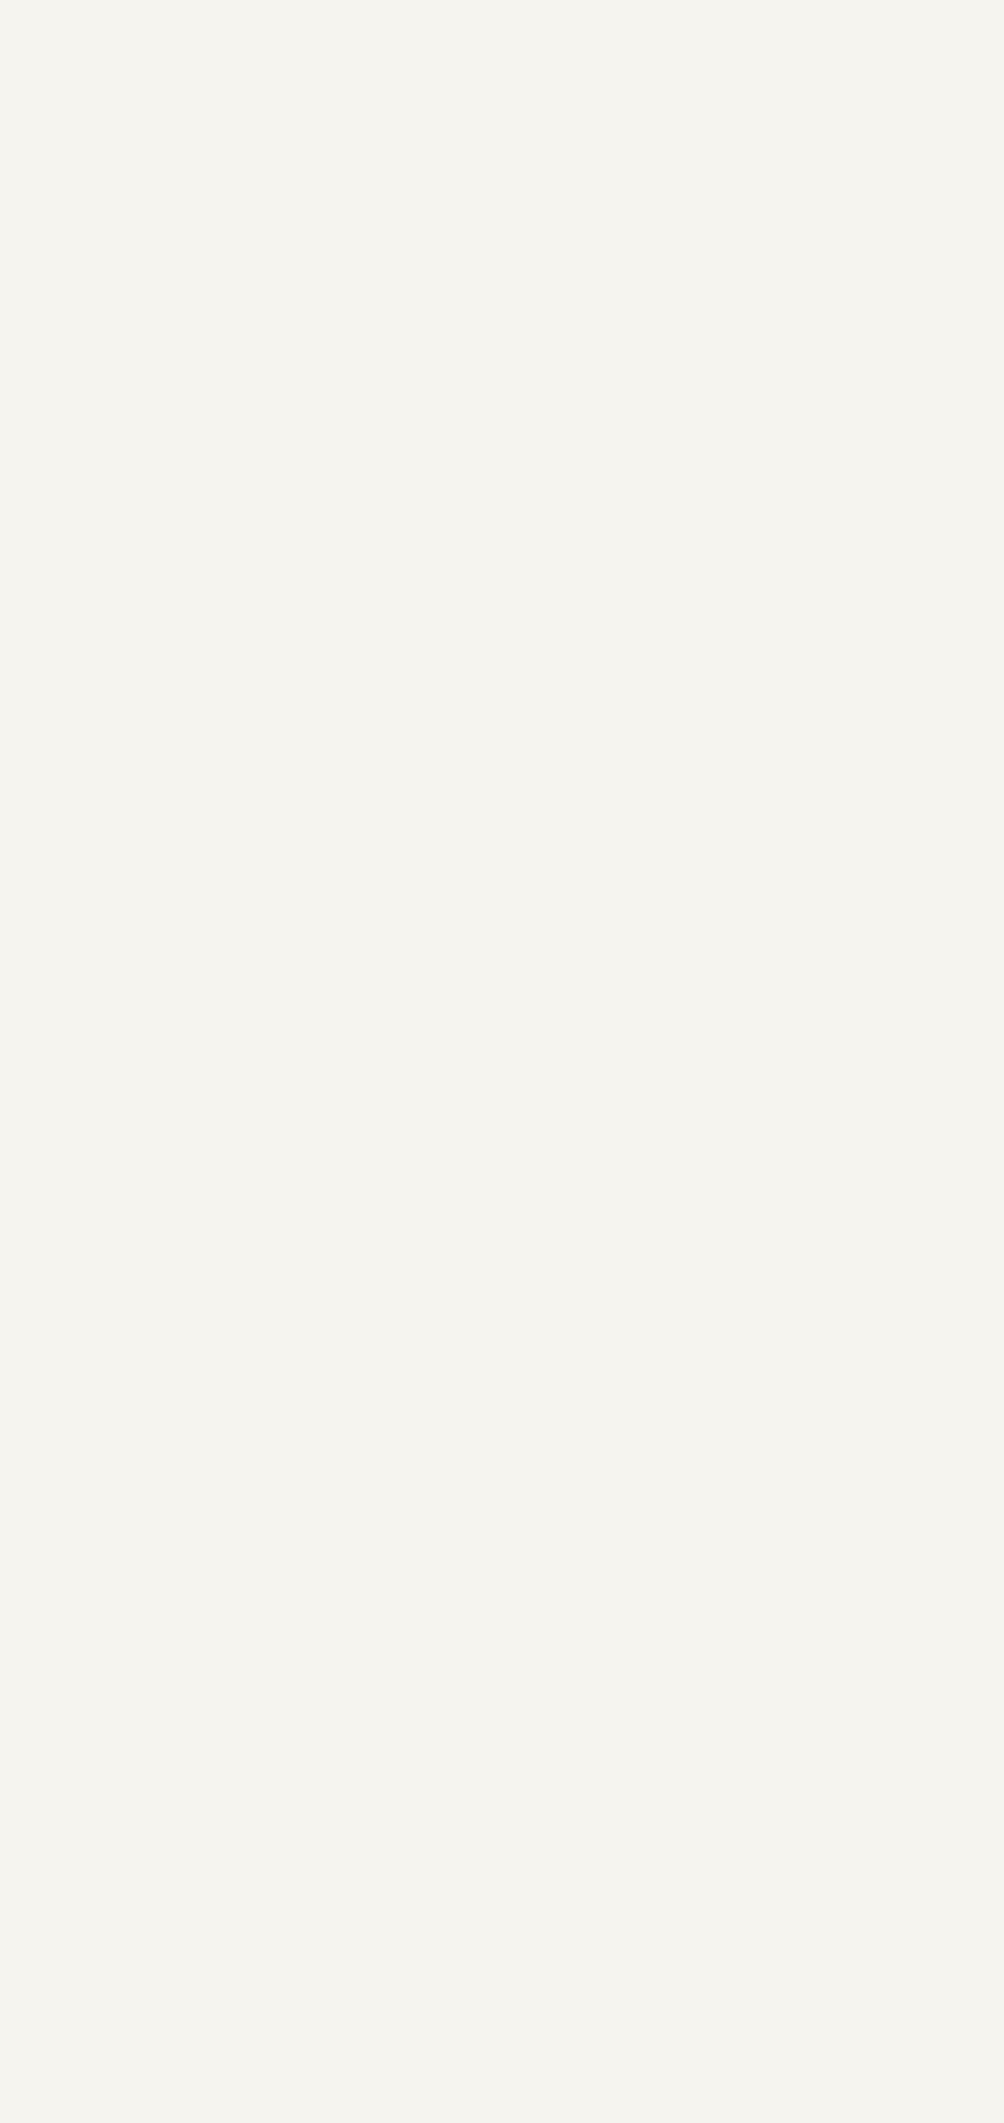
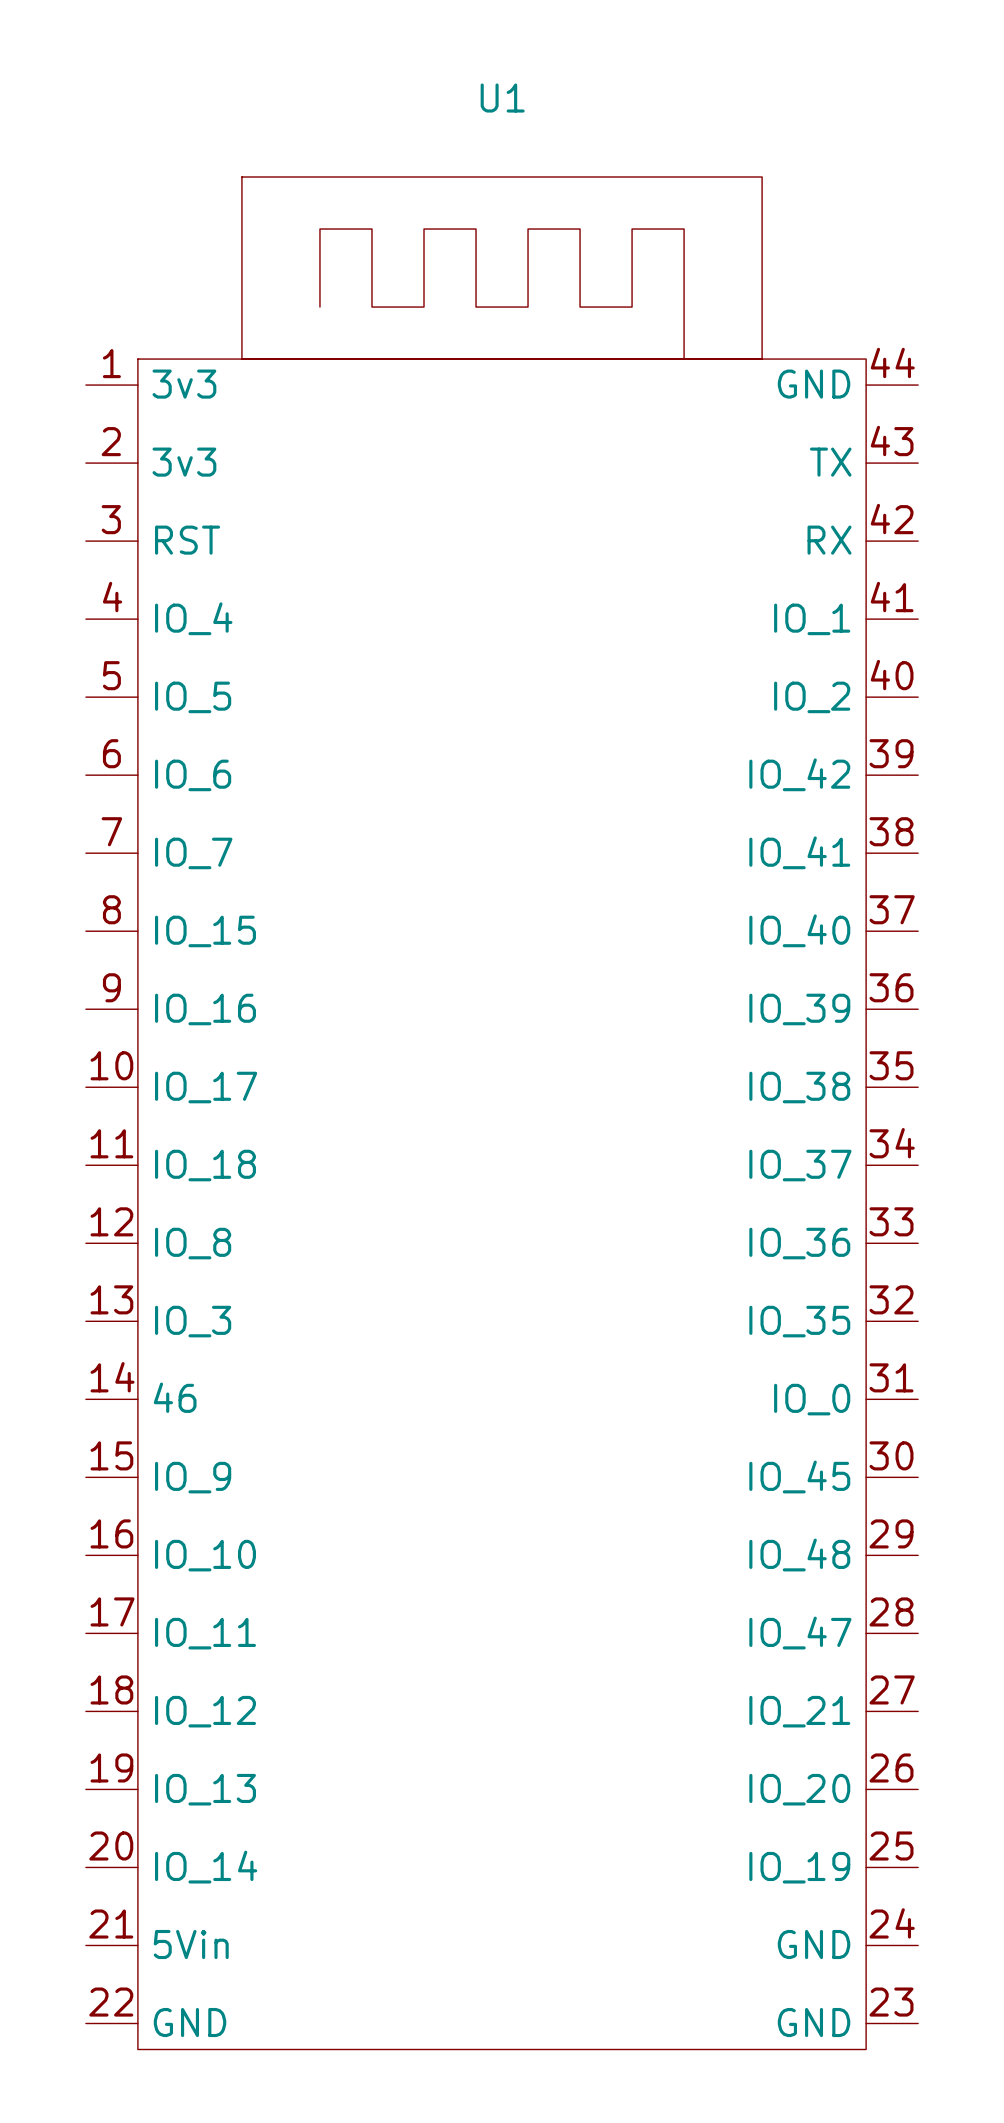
U1: none -> (502, 1113)

